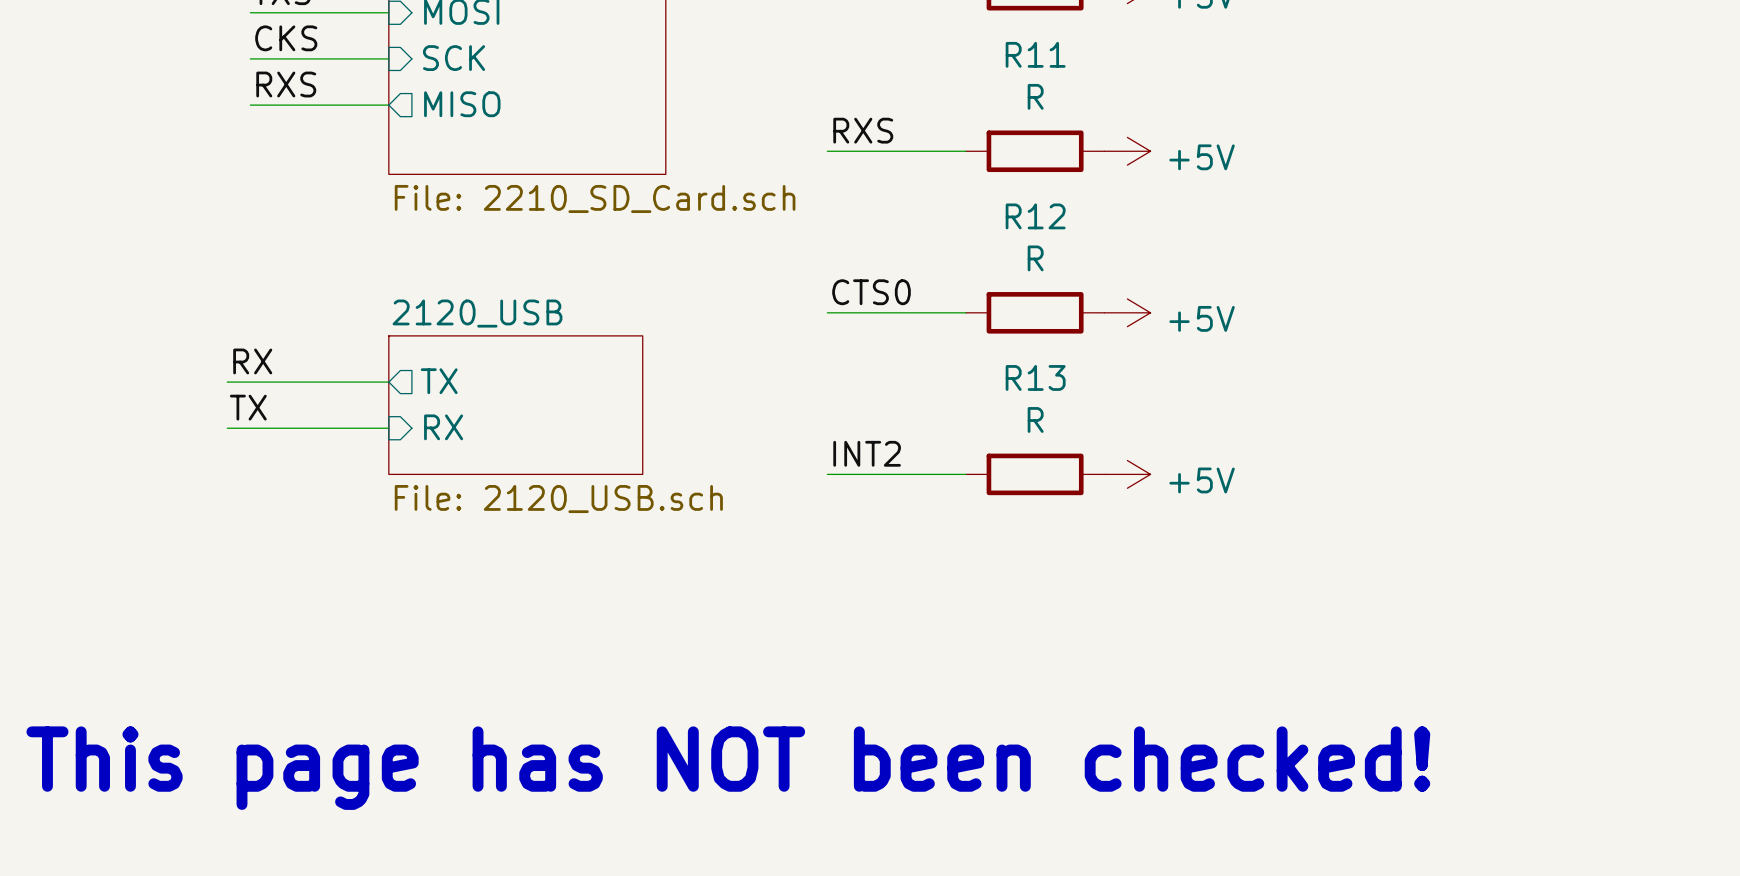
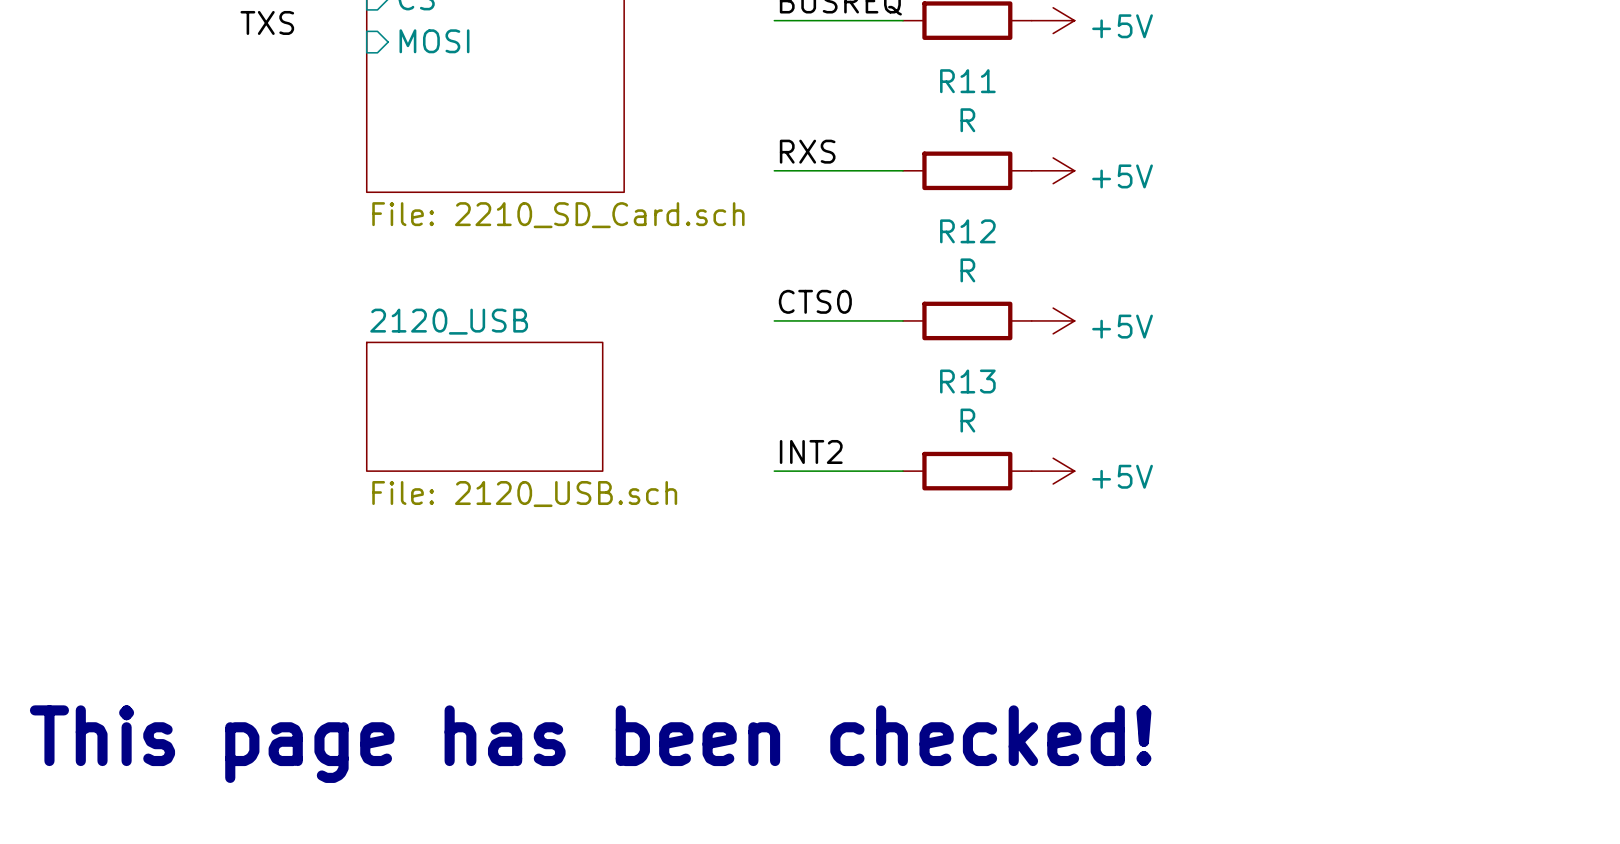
wire: (250, 12) (388, 12) -> none
label: CKS (286, 38) -> none
wire: (250, 58) (388, 58) -> none
sheet pin: SCK (454, 58) -> none
label: RXS (286, 84) -> none
sheet pin: MISO (462, 104) -> none
wire: (250, 105) (388, 105) -> none
label: RX (252, 361) -> none
sheet pin: TX (439, 381) -> none
wire: (227, 382) (388, 382) -> none
label: TX (248, 407) -> none
sheet pin: RX (443, 427) -> none
wire: (227, 428) (388, 428) -> none
text: This page has NOT been checked! (728, 768) -> This page has been checked! (590, 744)

